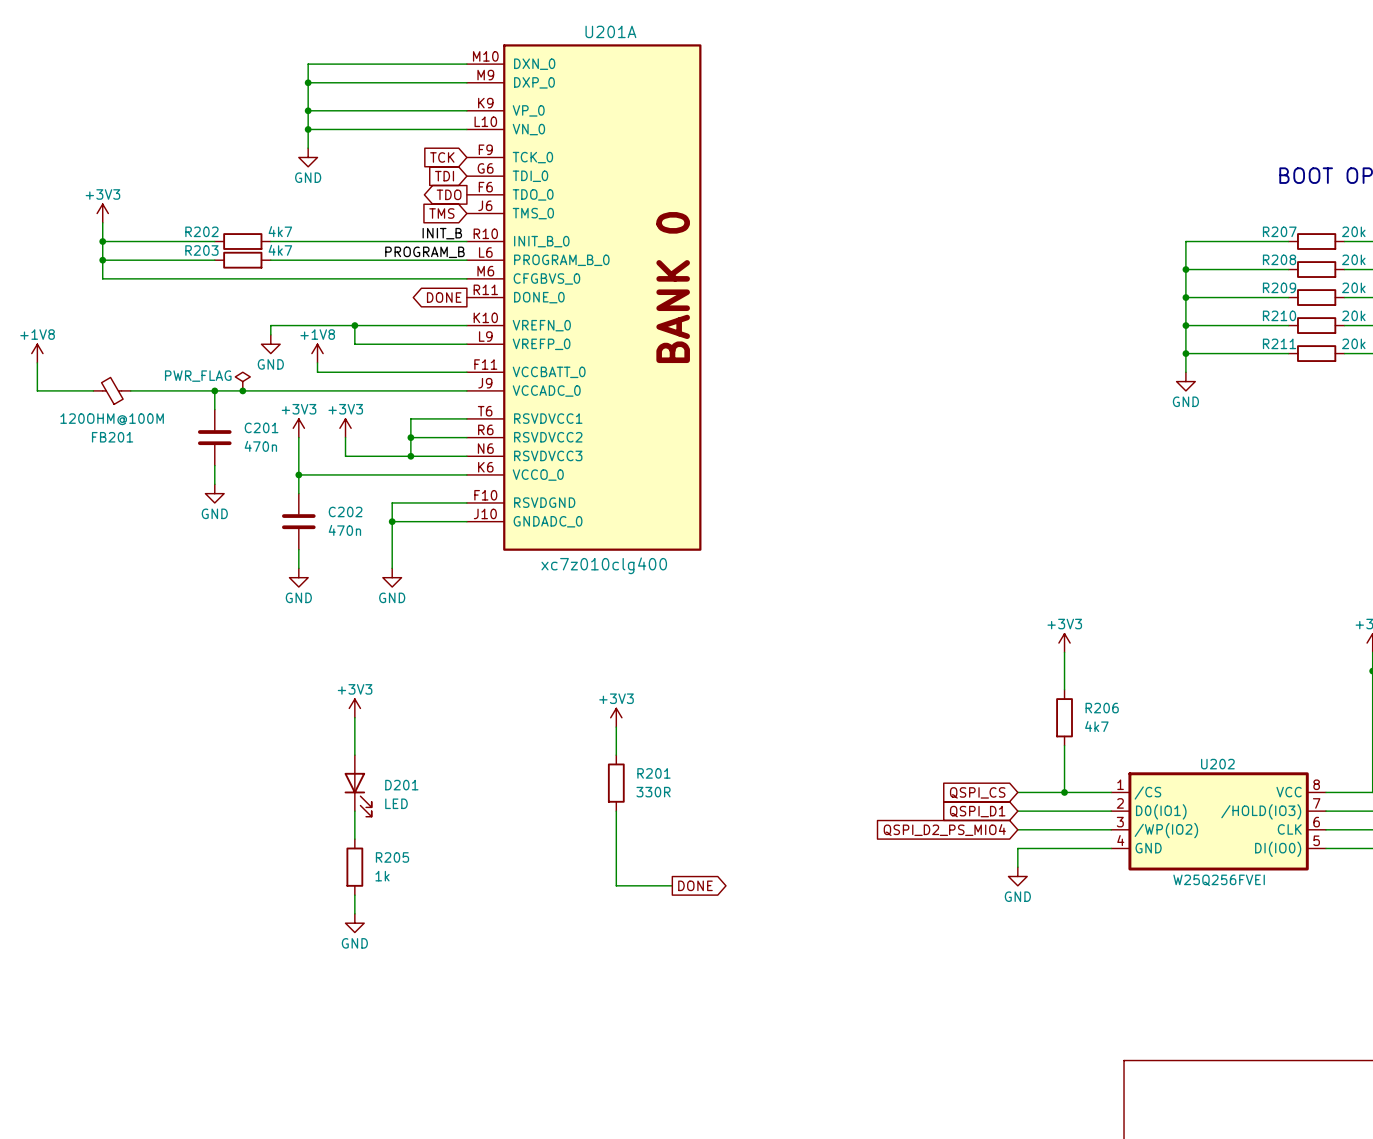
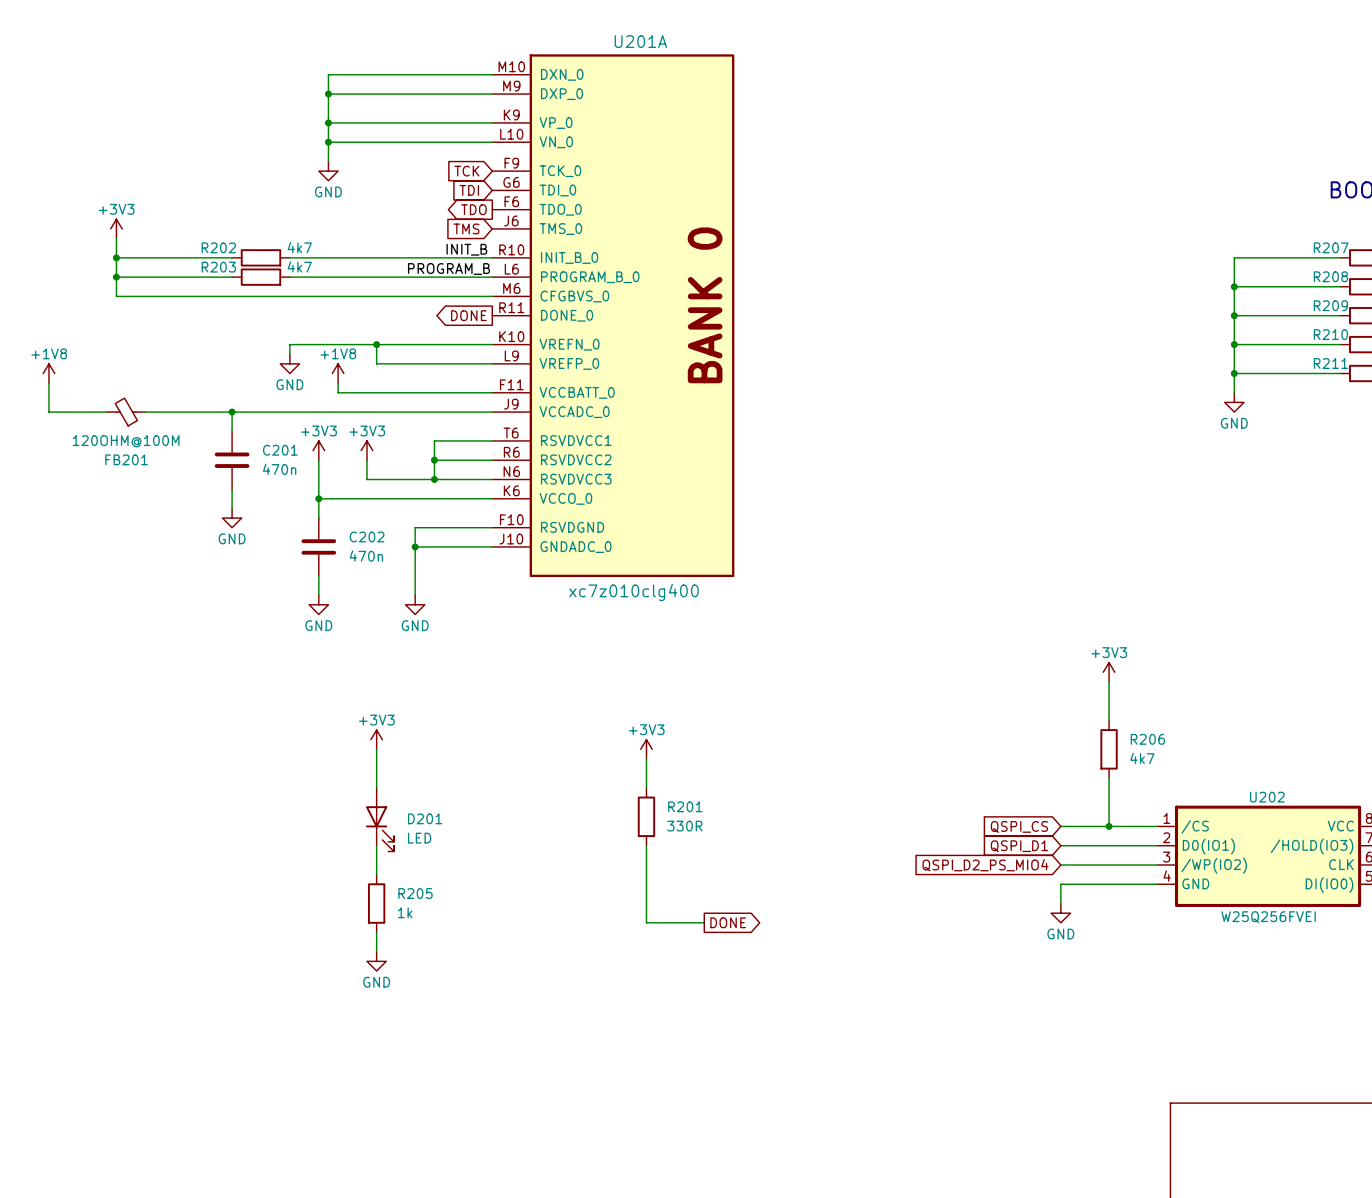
power symbol: PWR_FLAG (242, 381) -> none
junction: (242, 390) -> none

